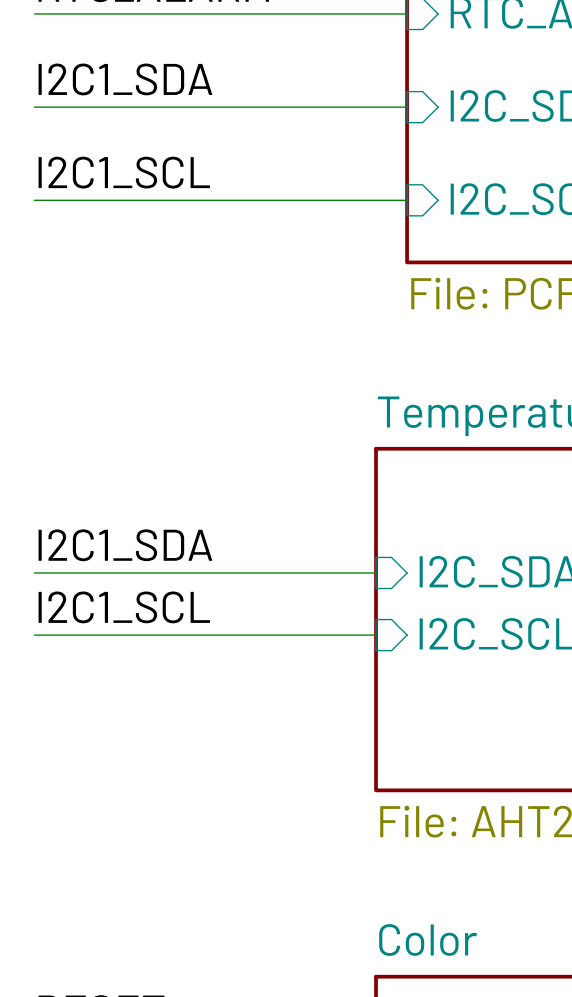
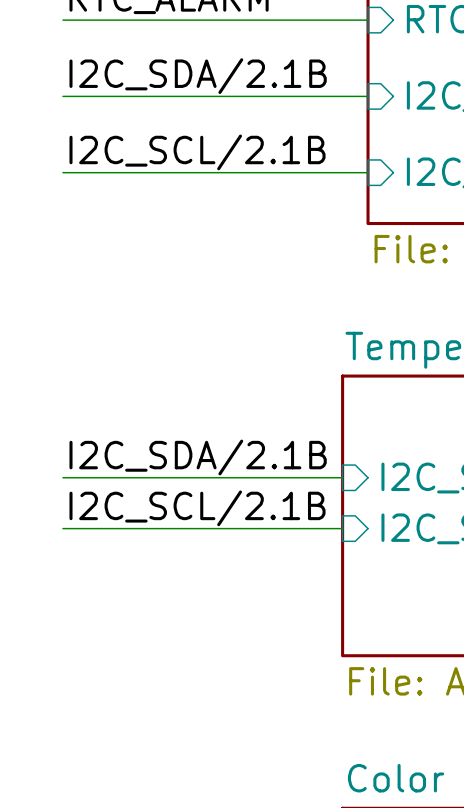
label: I2C1_SDA (125, 79) -> I2C_SDA/2.1B (198, 76)
label: I2C1_SCL (124, 172) -> I2C_SCL/2.1B (197, 152)
label: I2C1_SDA (125, 545) -> I2C_SDA/2.1B (198, 457)
label: I2C1_SCL (124, 607) -> I2C_SCL/2.1B (197, 508)

